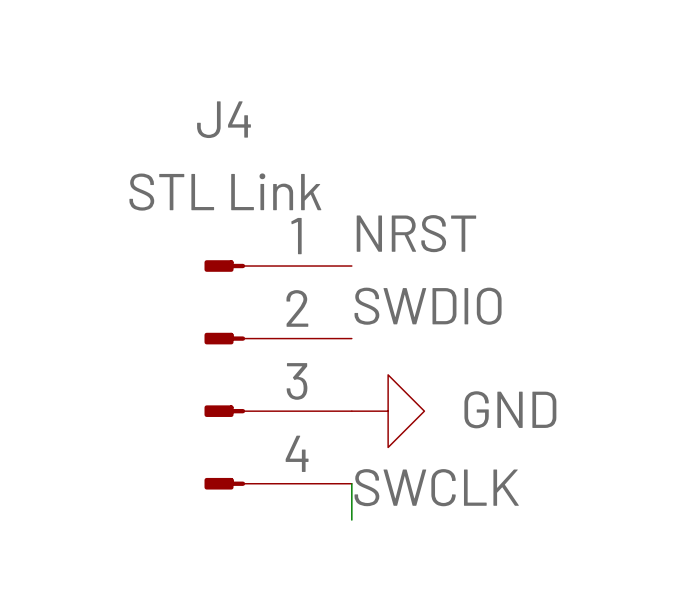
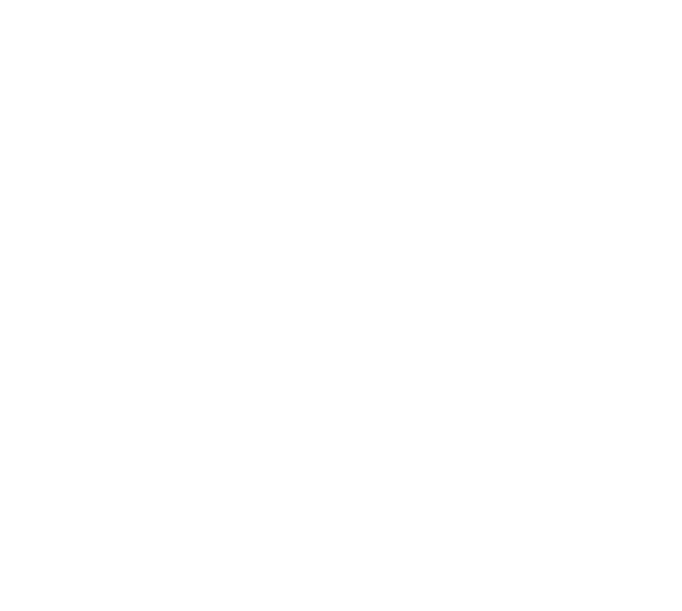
label: NRST (416, 233) -> none
label: SWDIO (428, 306) -> none
J4: STL Link (278, 374) -> none
power symbol: GND (388, 411) -> none
wire: (351, 483) (351, 520) -> none
label: SWCLK (436, 487) -> none

